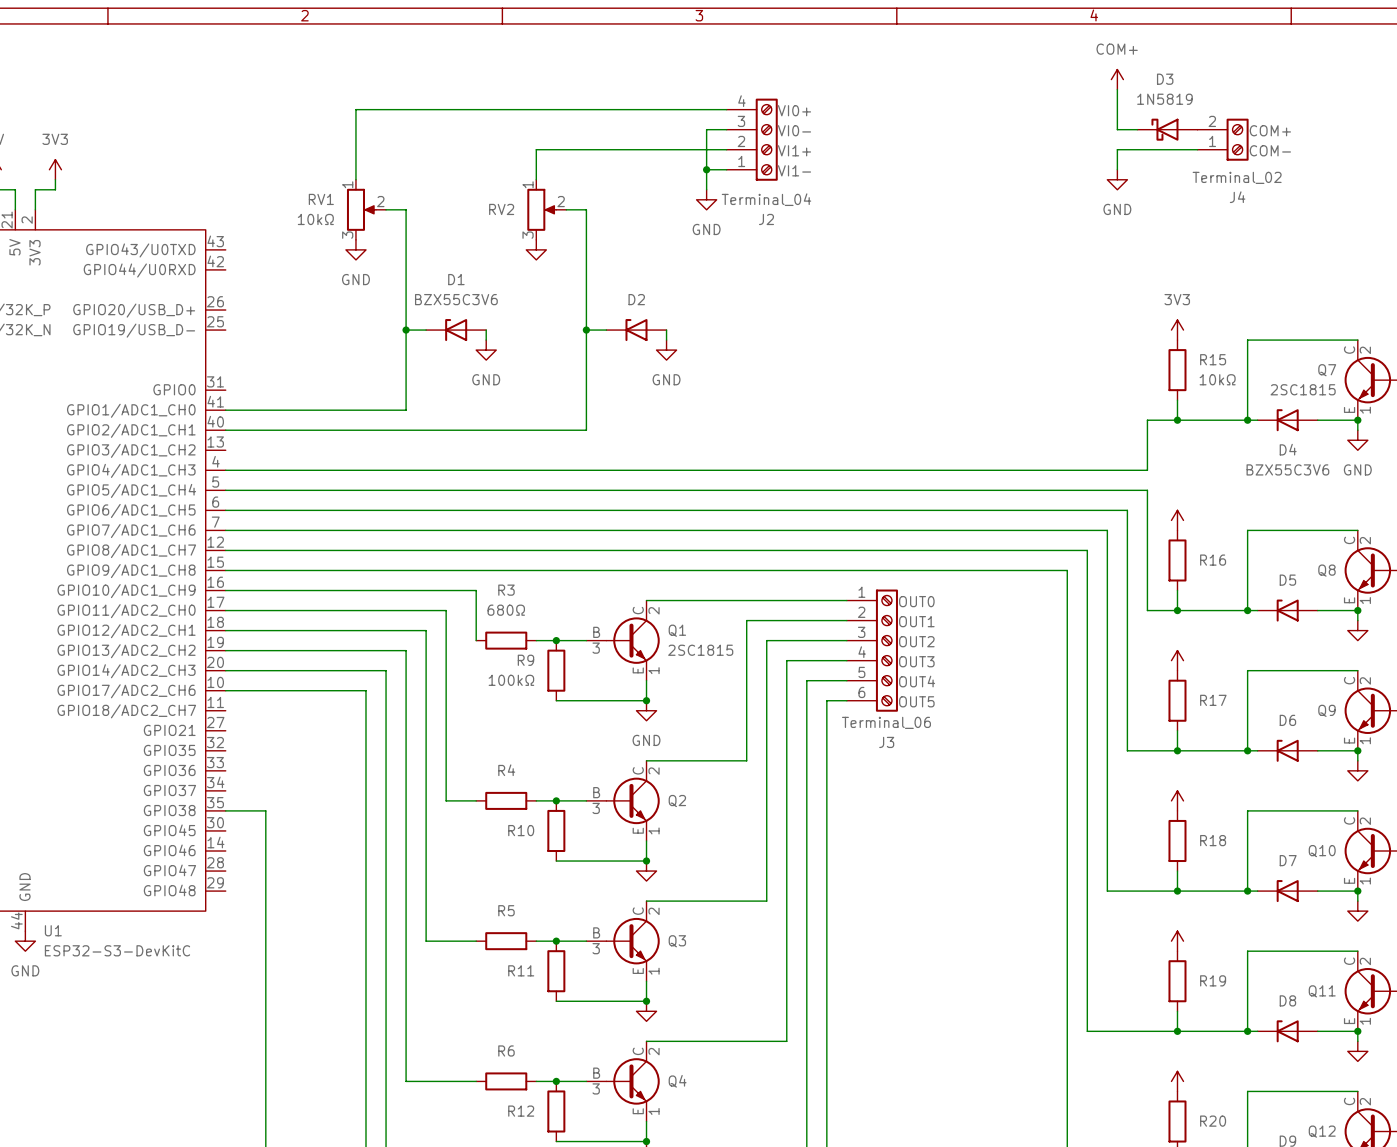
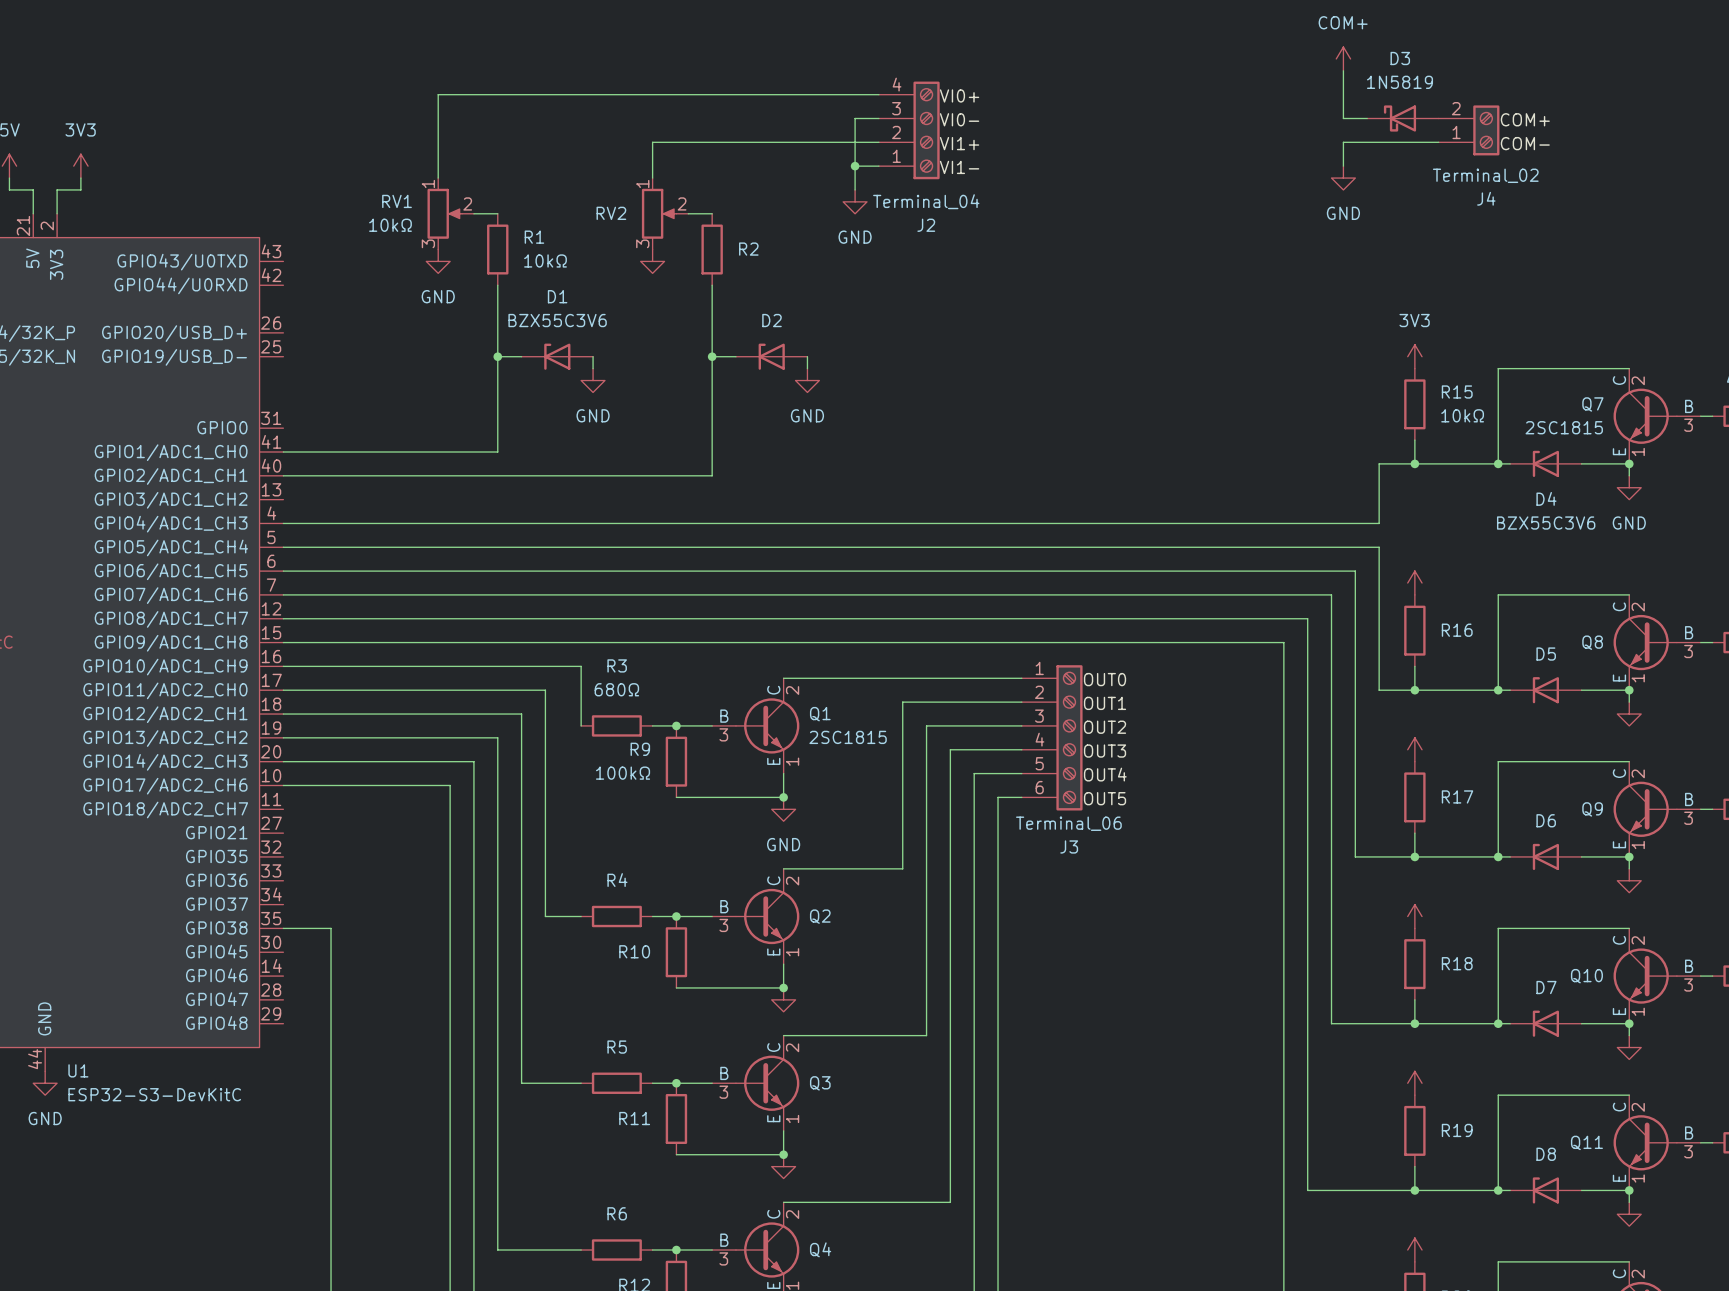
wire: (406, 209) (406, 269) -> none
wire: (586, 209) (586, 269) -> none
R1: none -> 10kΩ (497, 249)
R2: none -> (712, 249)

